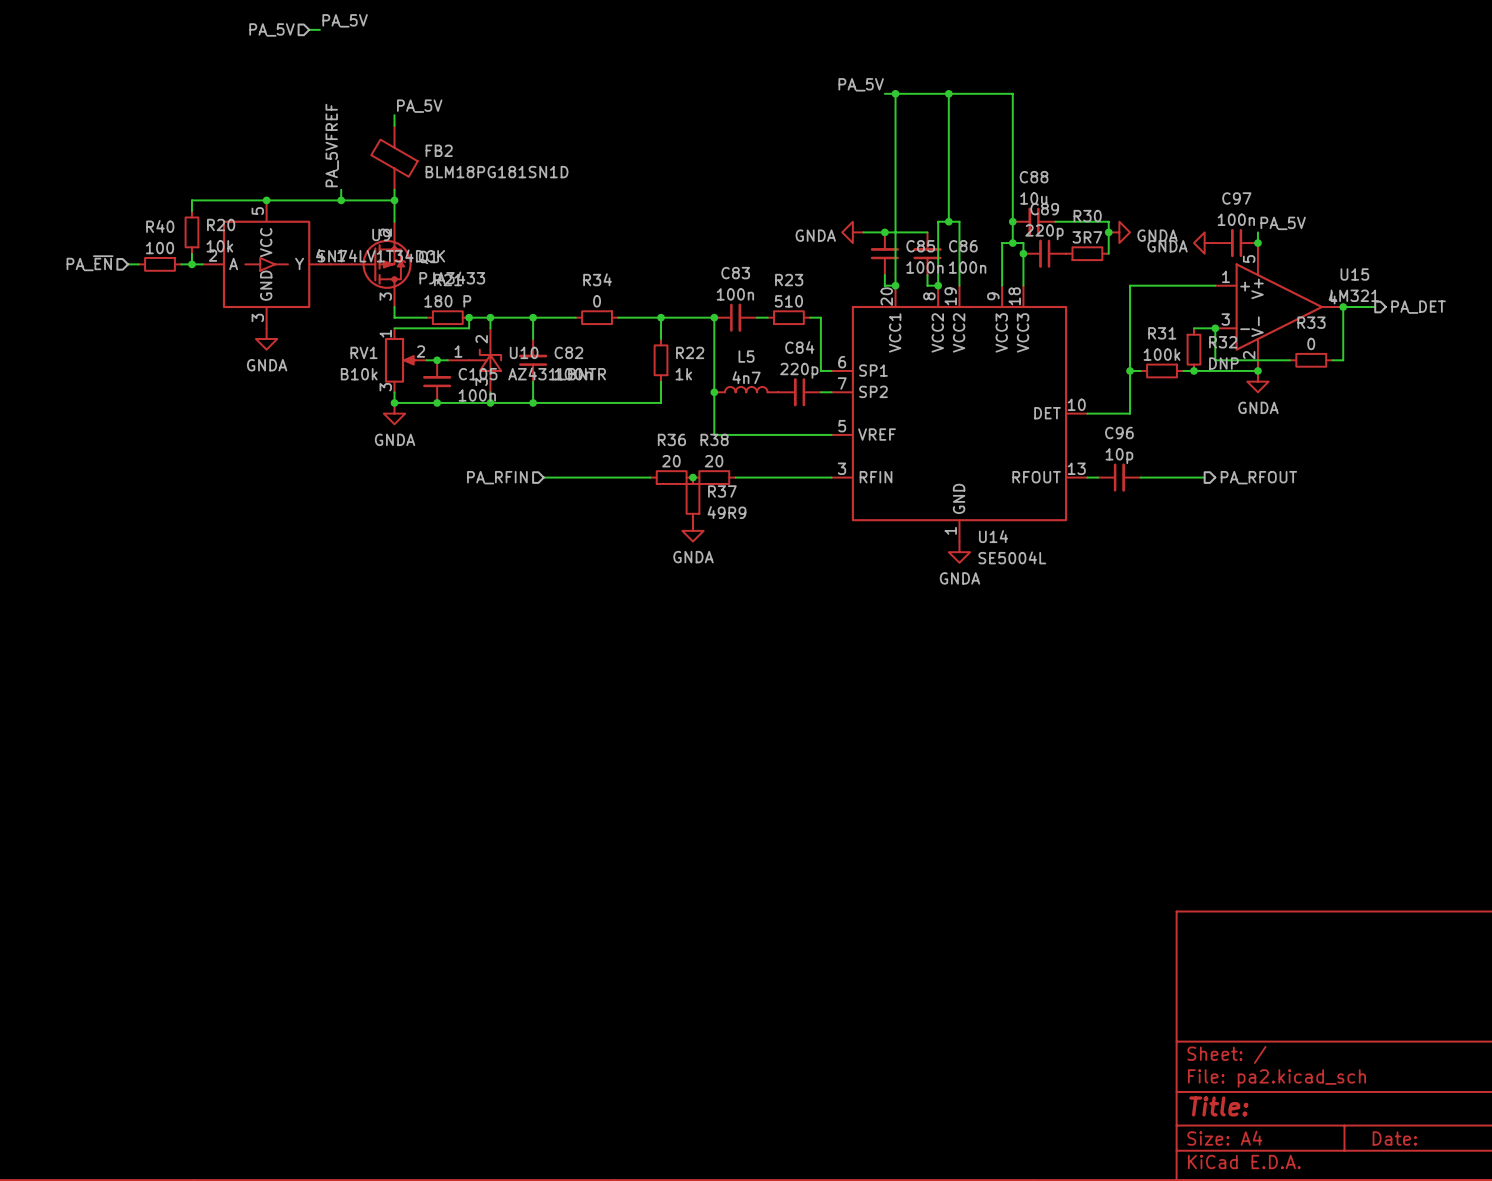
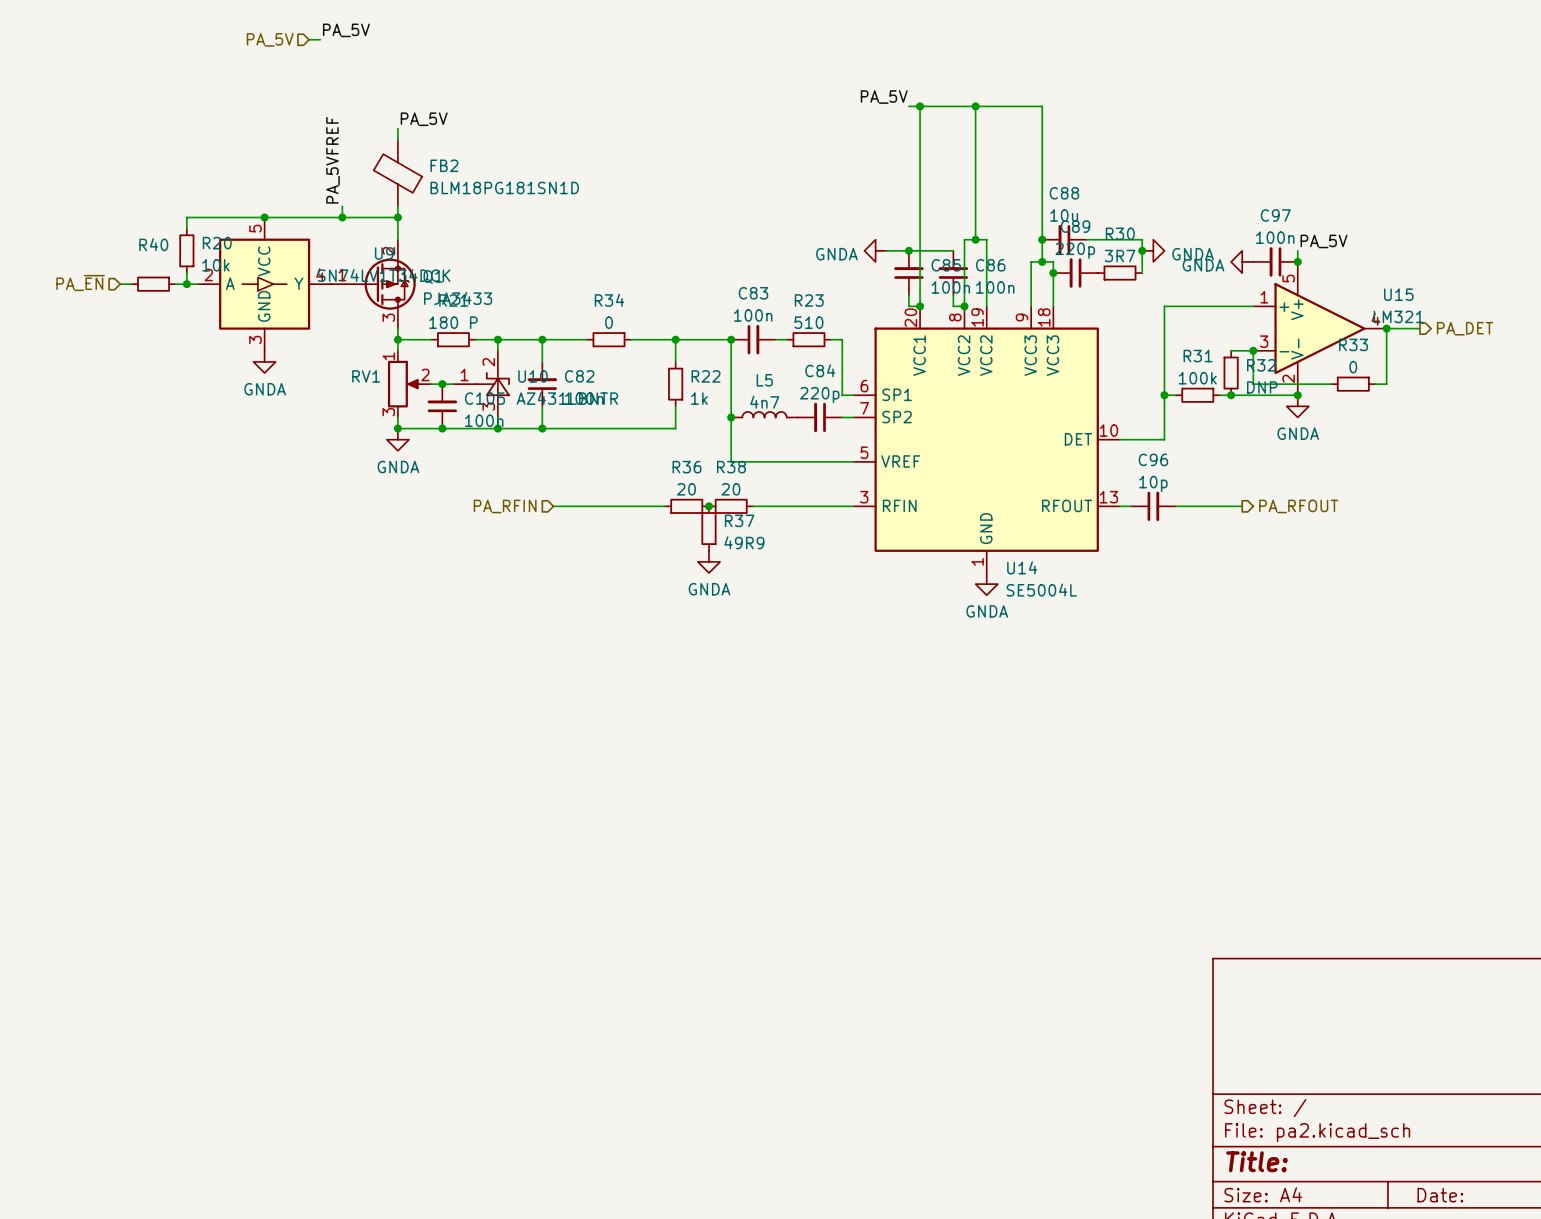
R40 value: 100 (160, 248) -> none
junction: none -> (397, 339)
wire: (469, 317) (469, 328) (394, 328) -> (397, 339) (397, 350)
junction: (469, 317) -> none
RV1 value: B10k (359, 374) -> none

